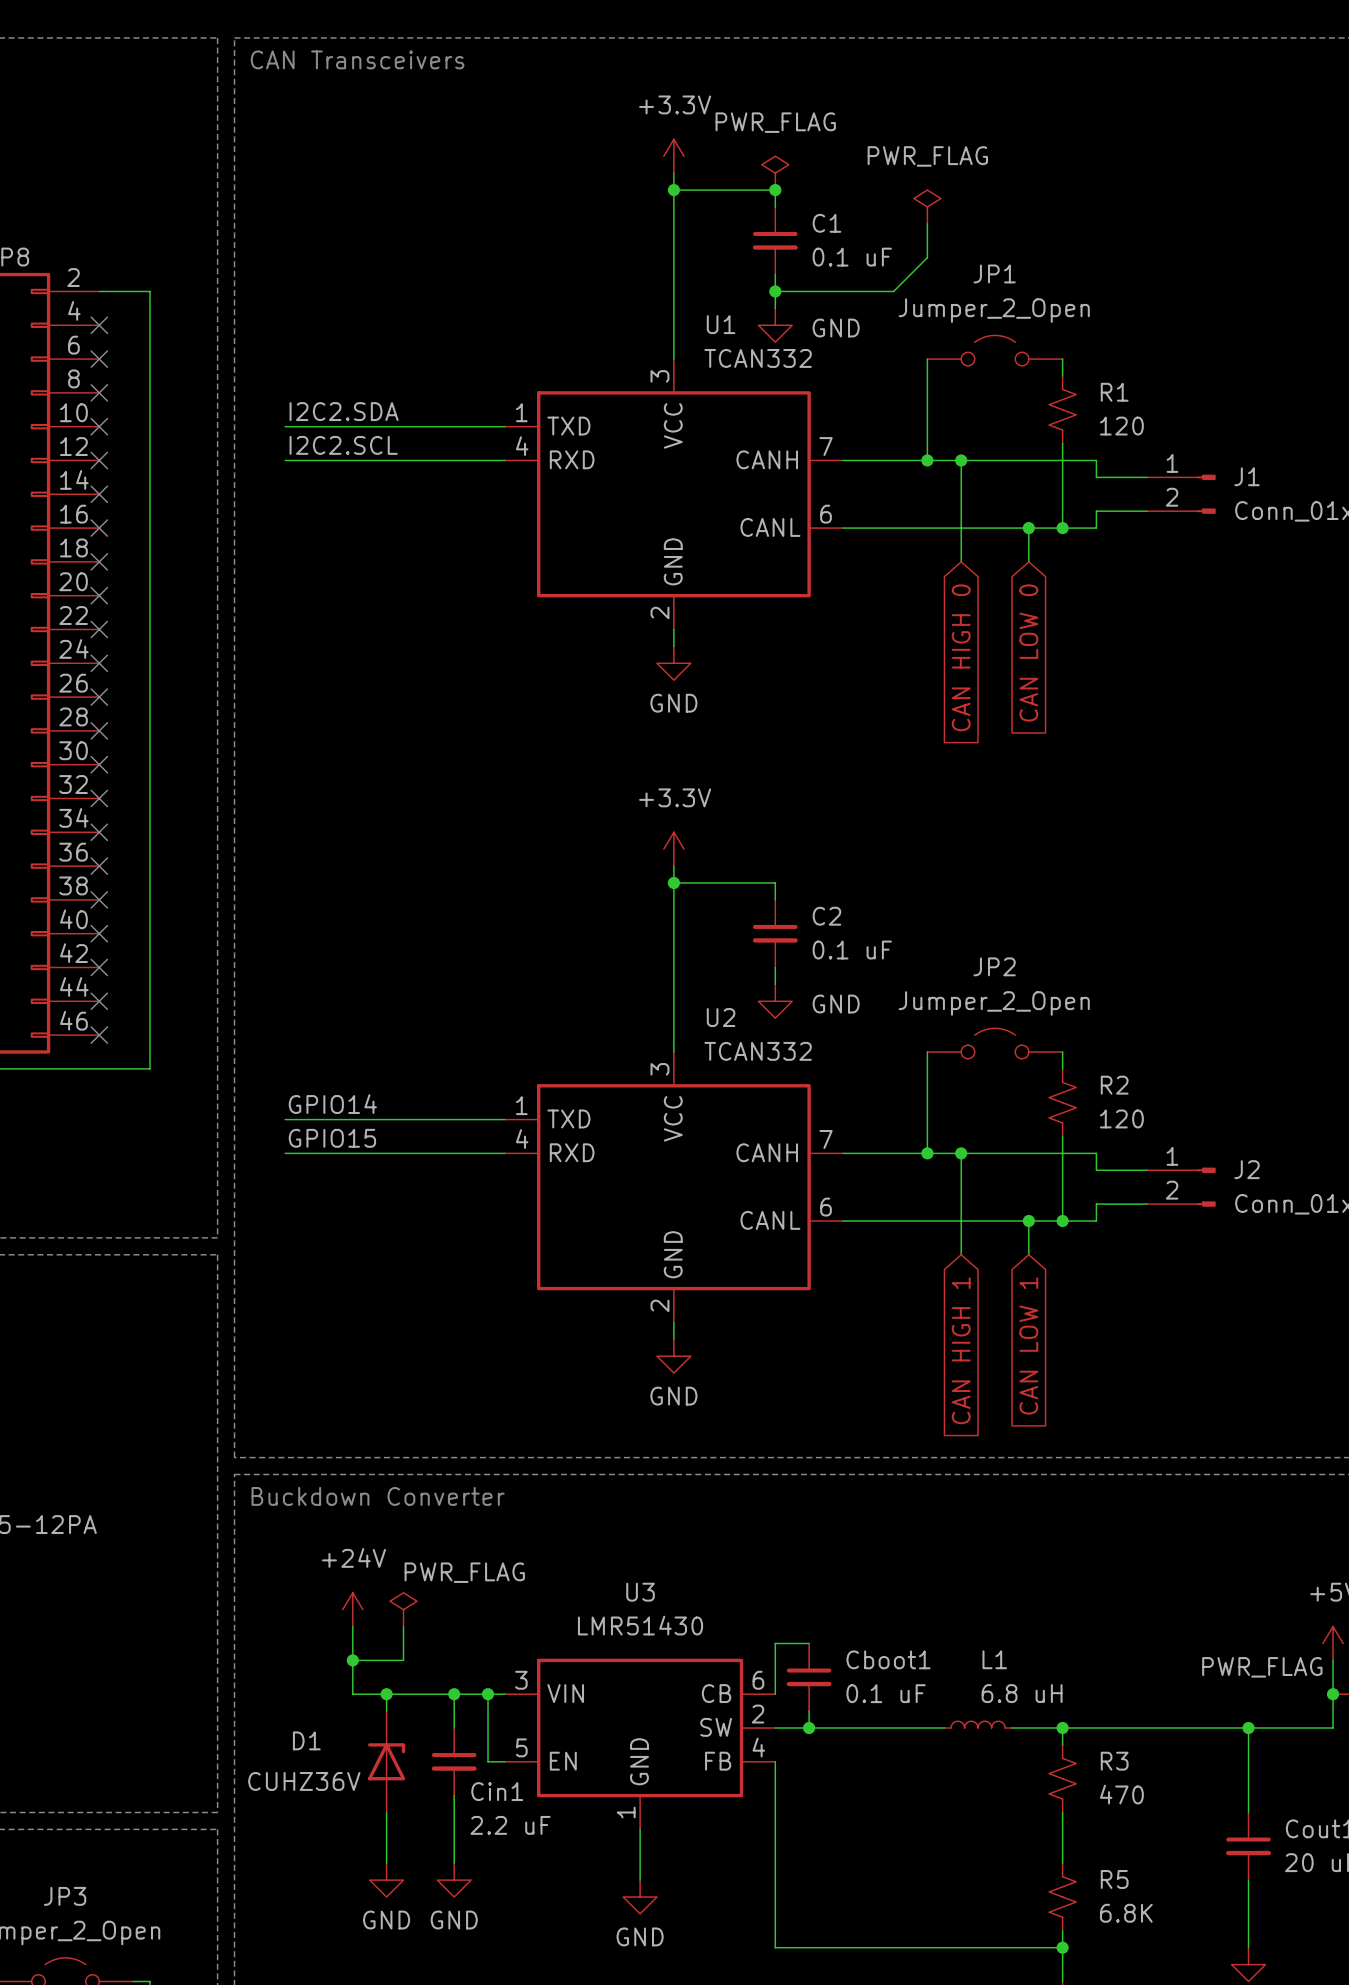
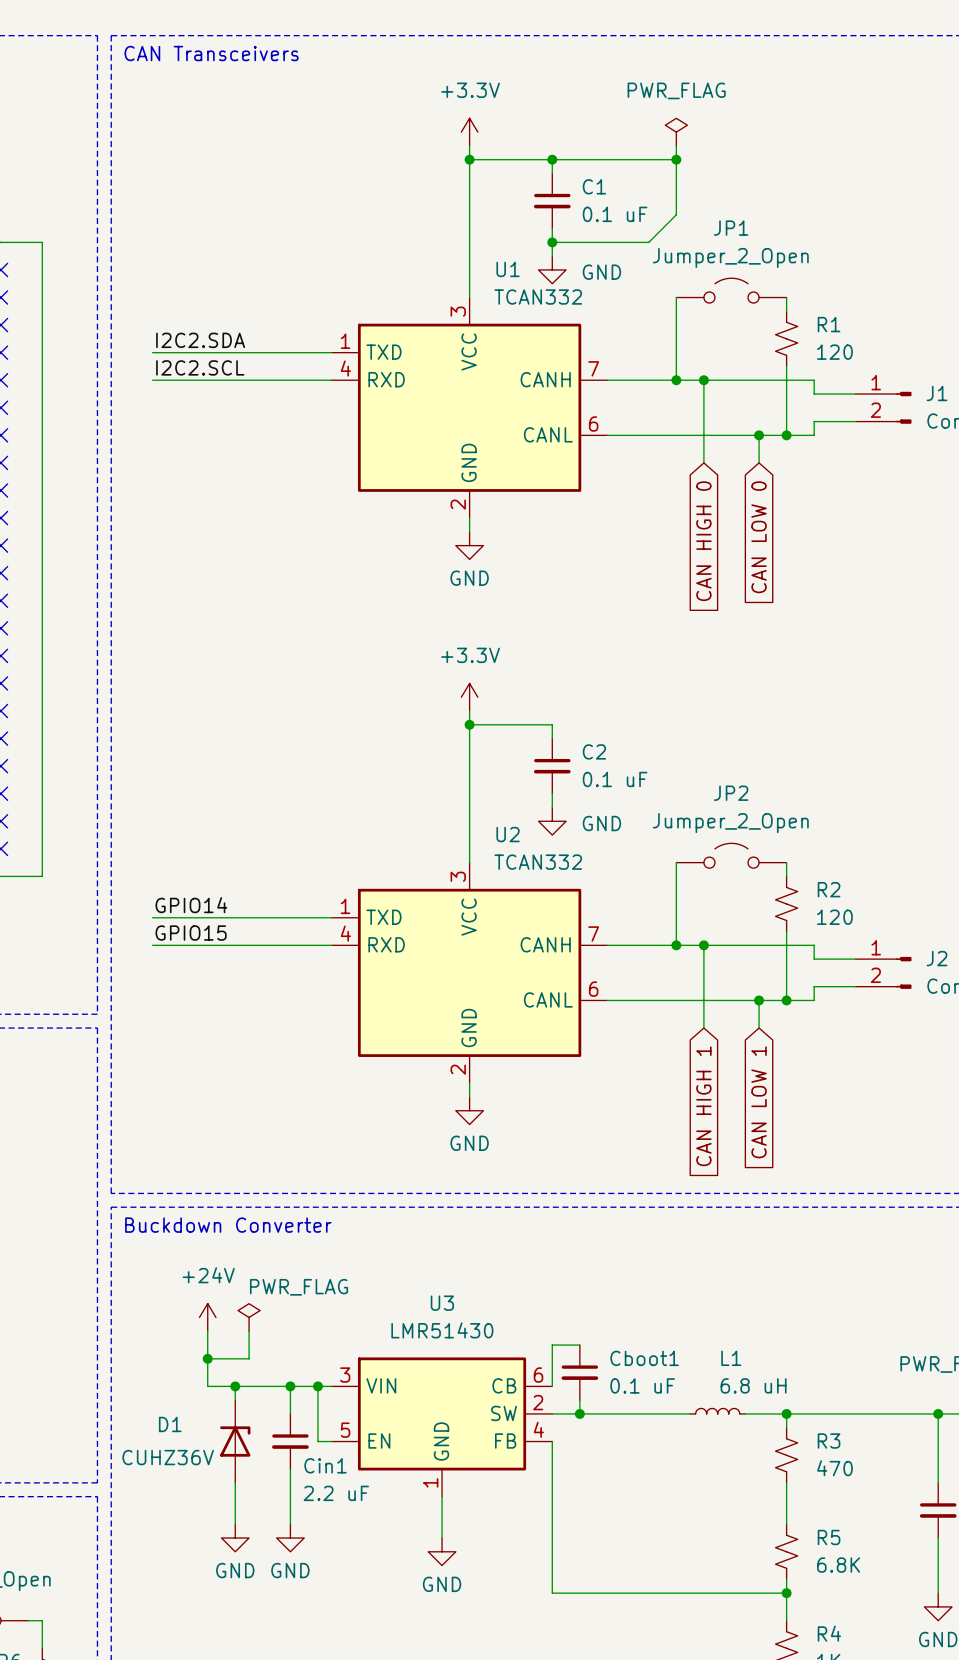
power symbol: PWR_FLAG (775, 173) -> none
wire: none -> (676, 145) (676, 187)
wire: none -> (552, 159) (676, 159)
junction: none -> (676, 159)
power symbol position: PWR_FLAG (927, 206) -> PWR_FLAG (676, 132)

